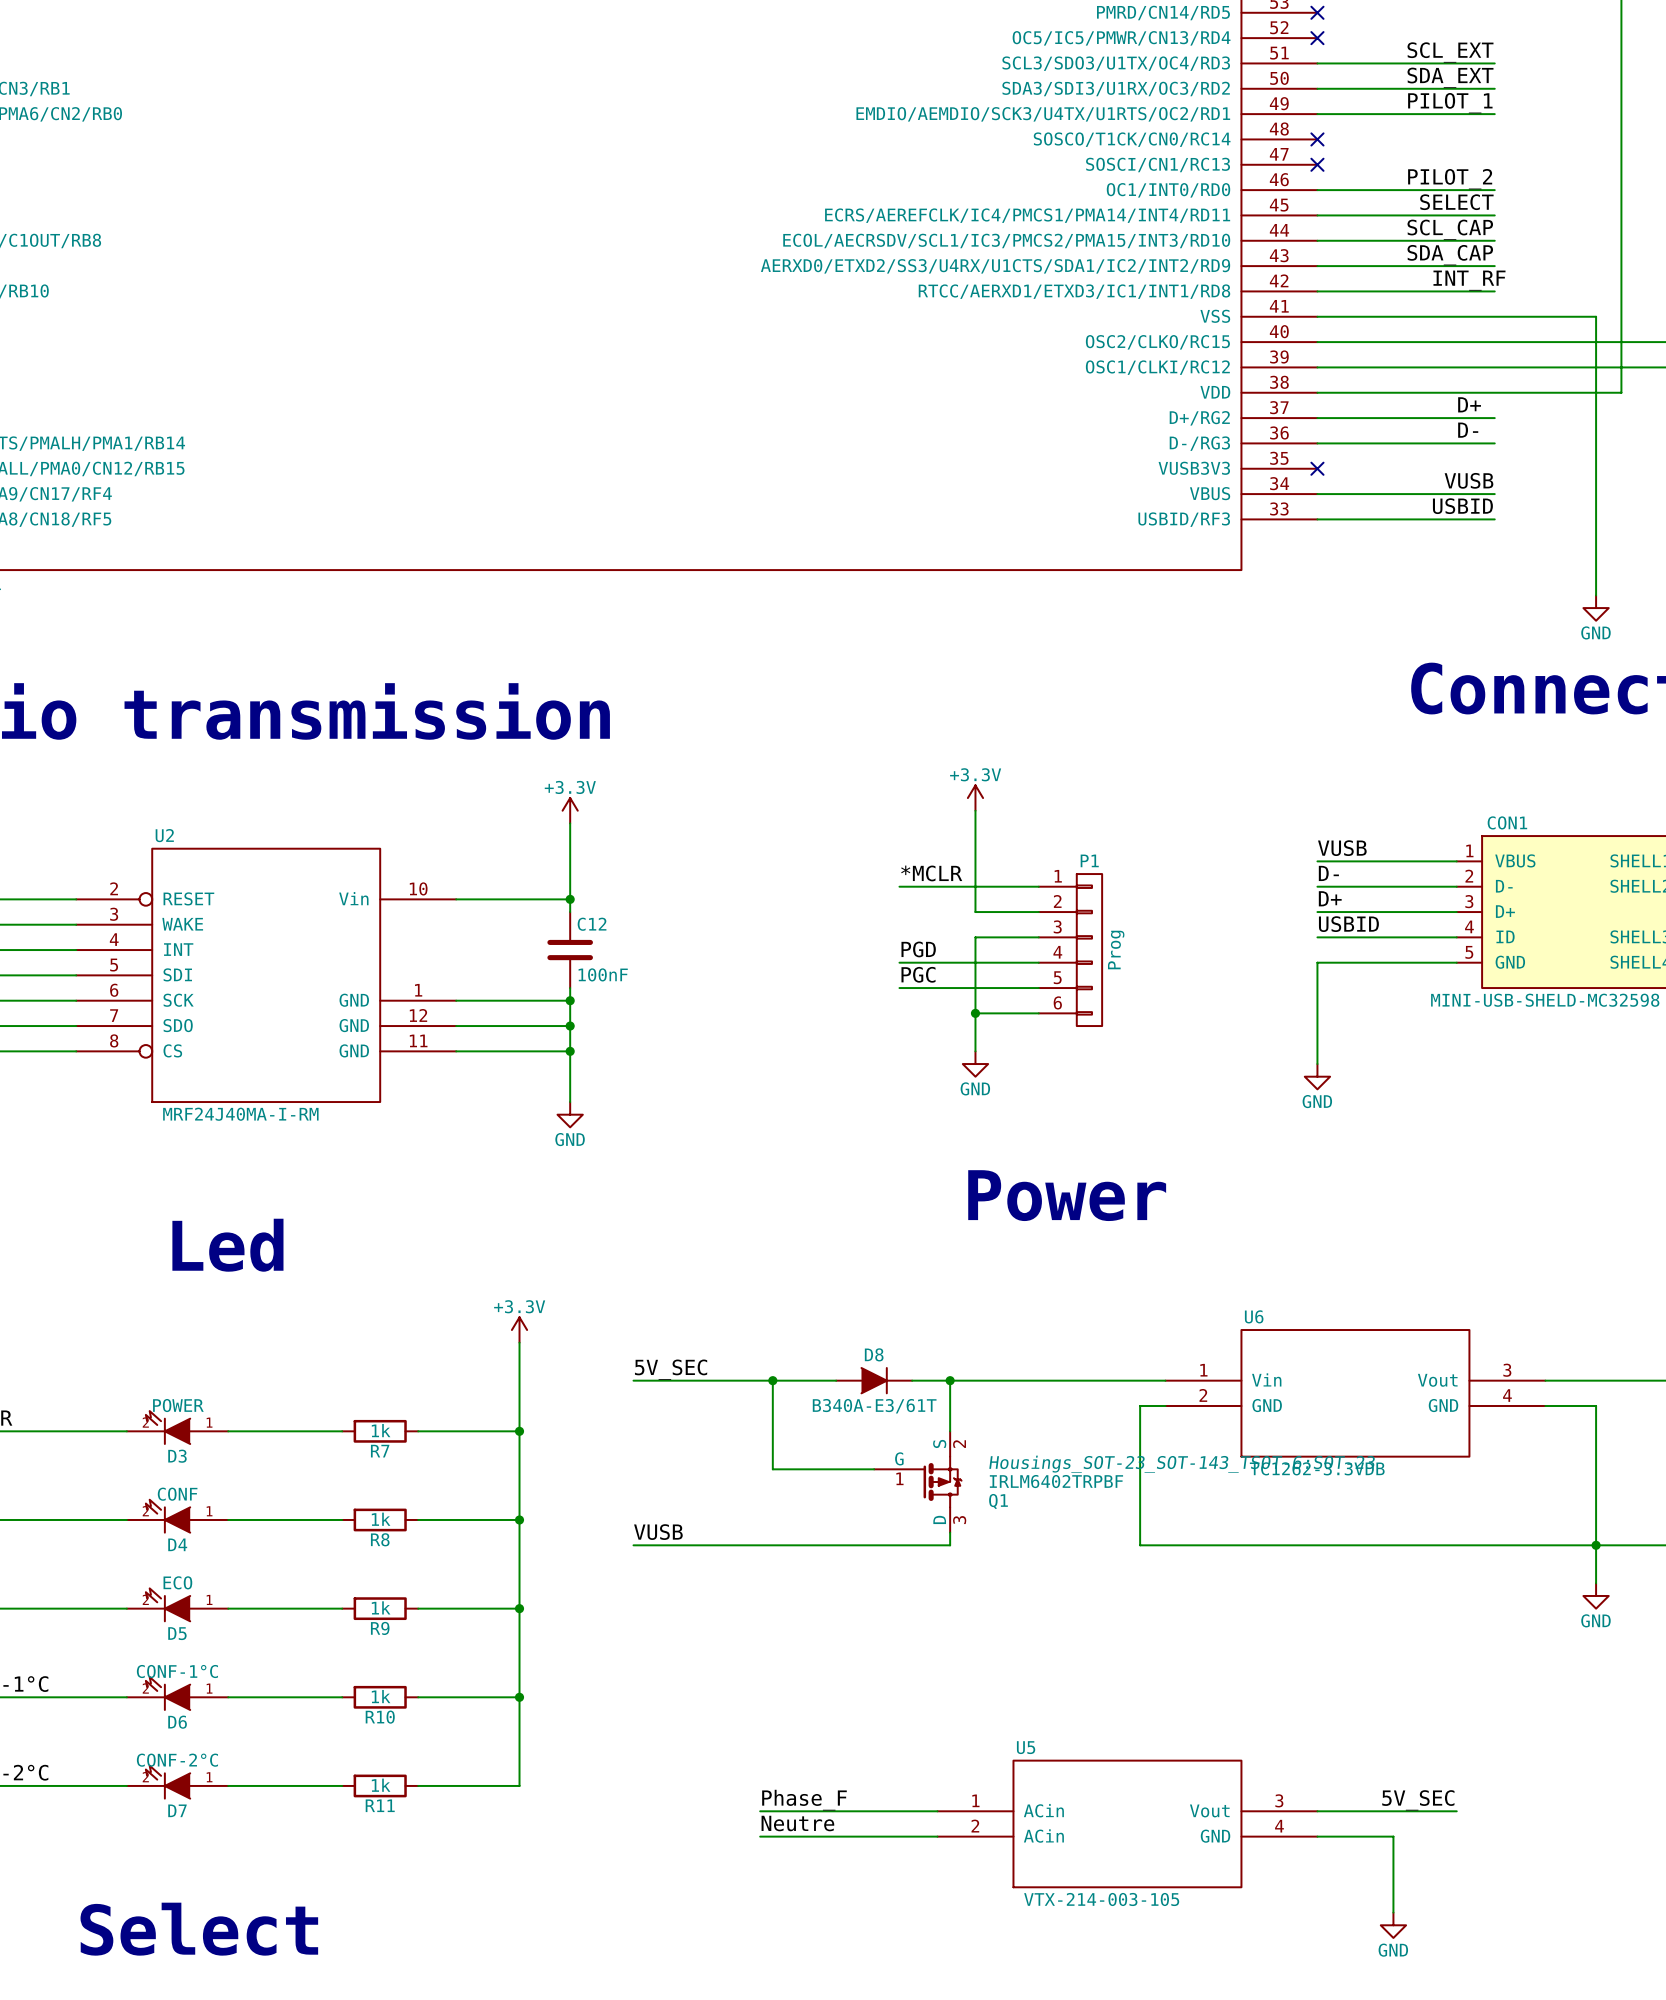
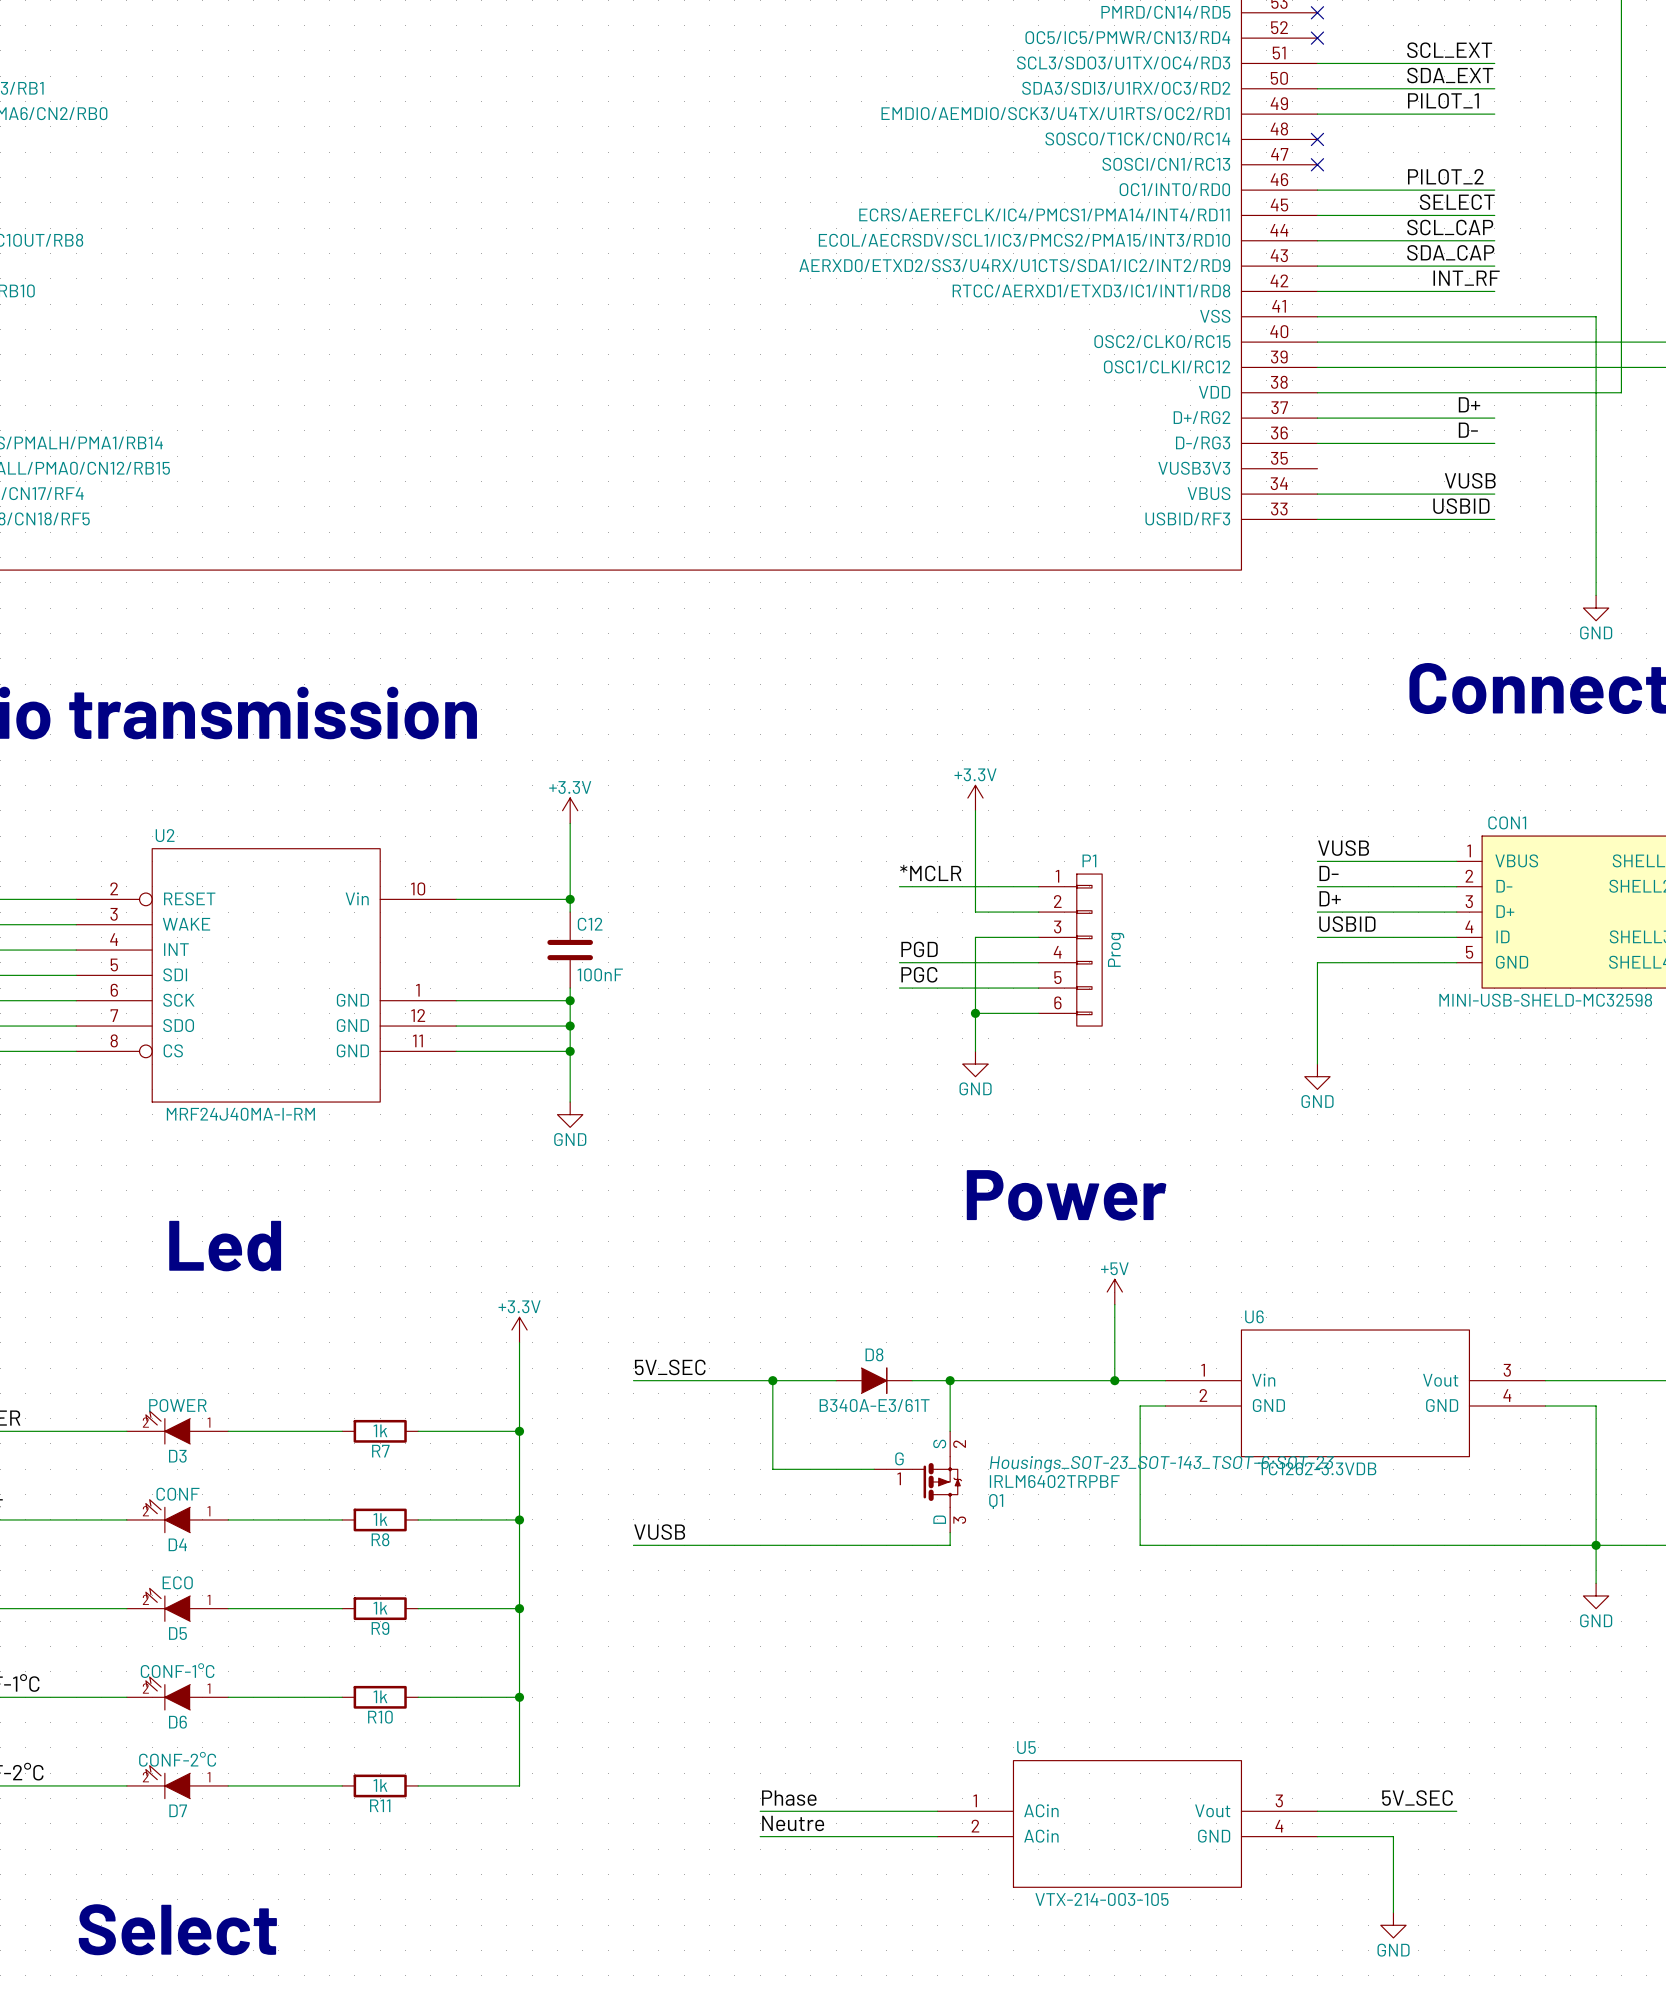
no-connect mark: (1317, 468) -> none
power symbol: none -> +5V (1114, 1292)
wire: none -> (1114, 1304) (1114, 1380)
junction: none -> (1114, 1380)
label: Phase_F (804, 1800) -> Phase (789, 1798)

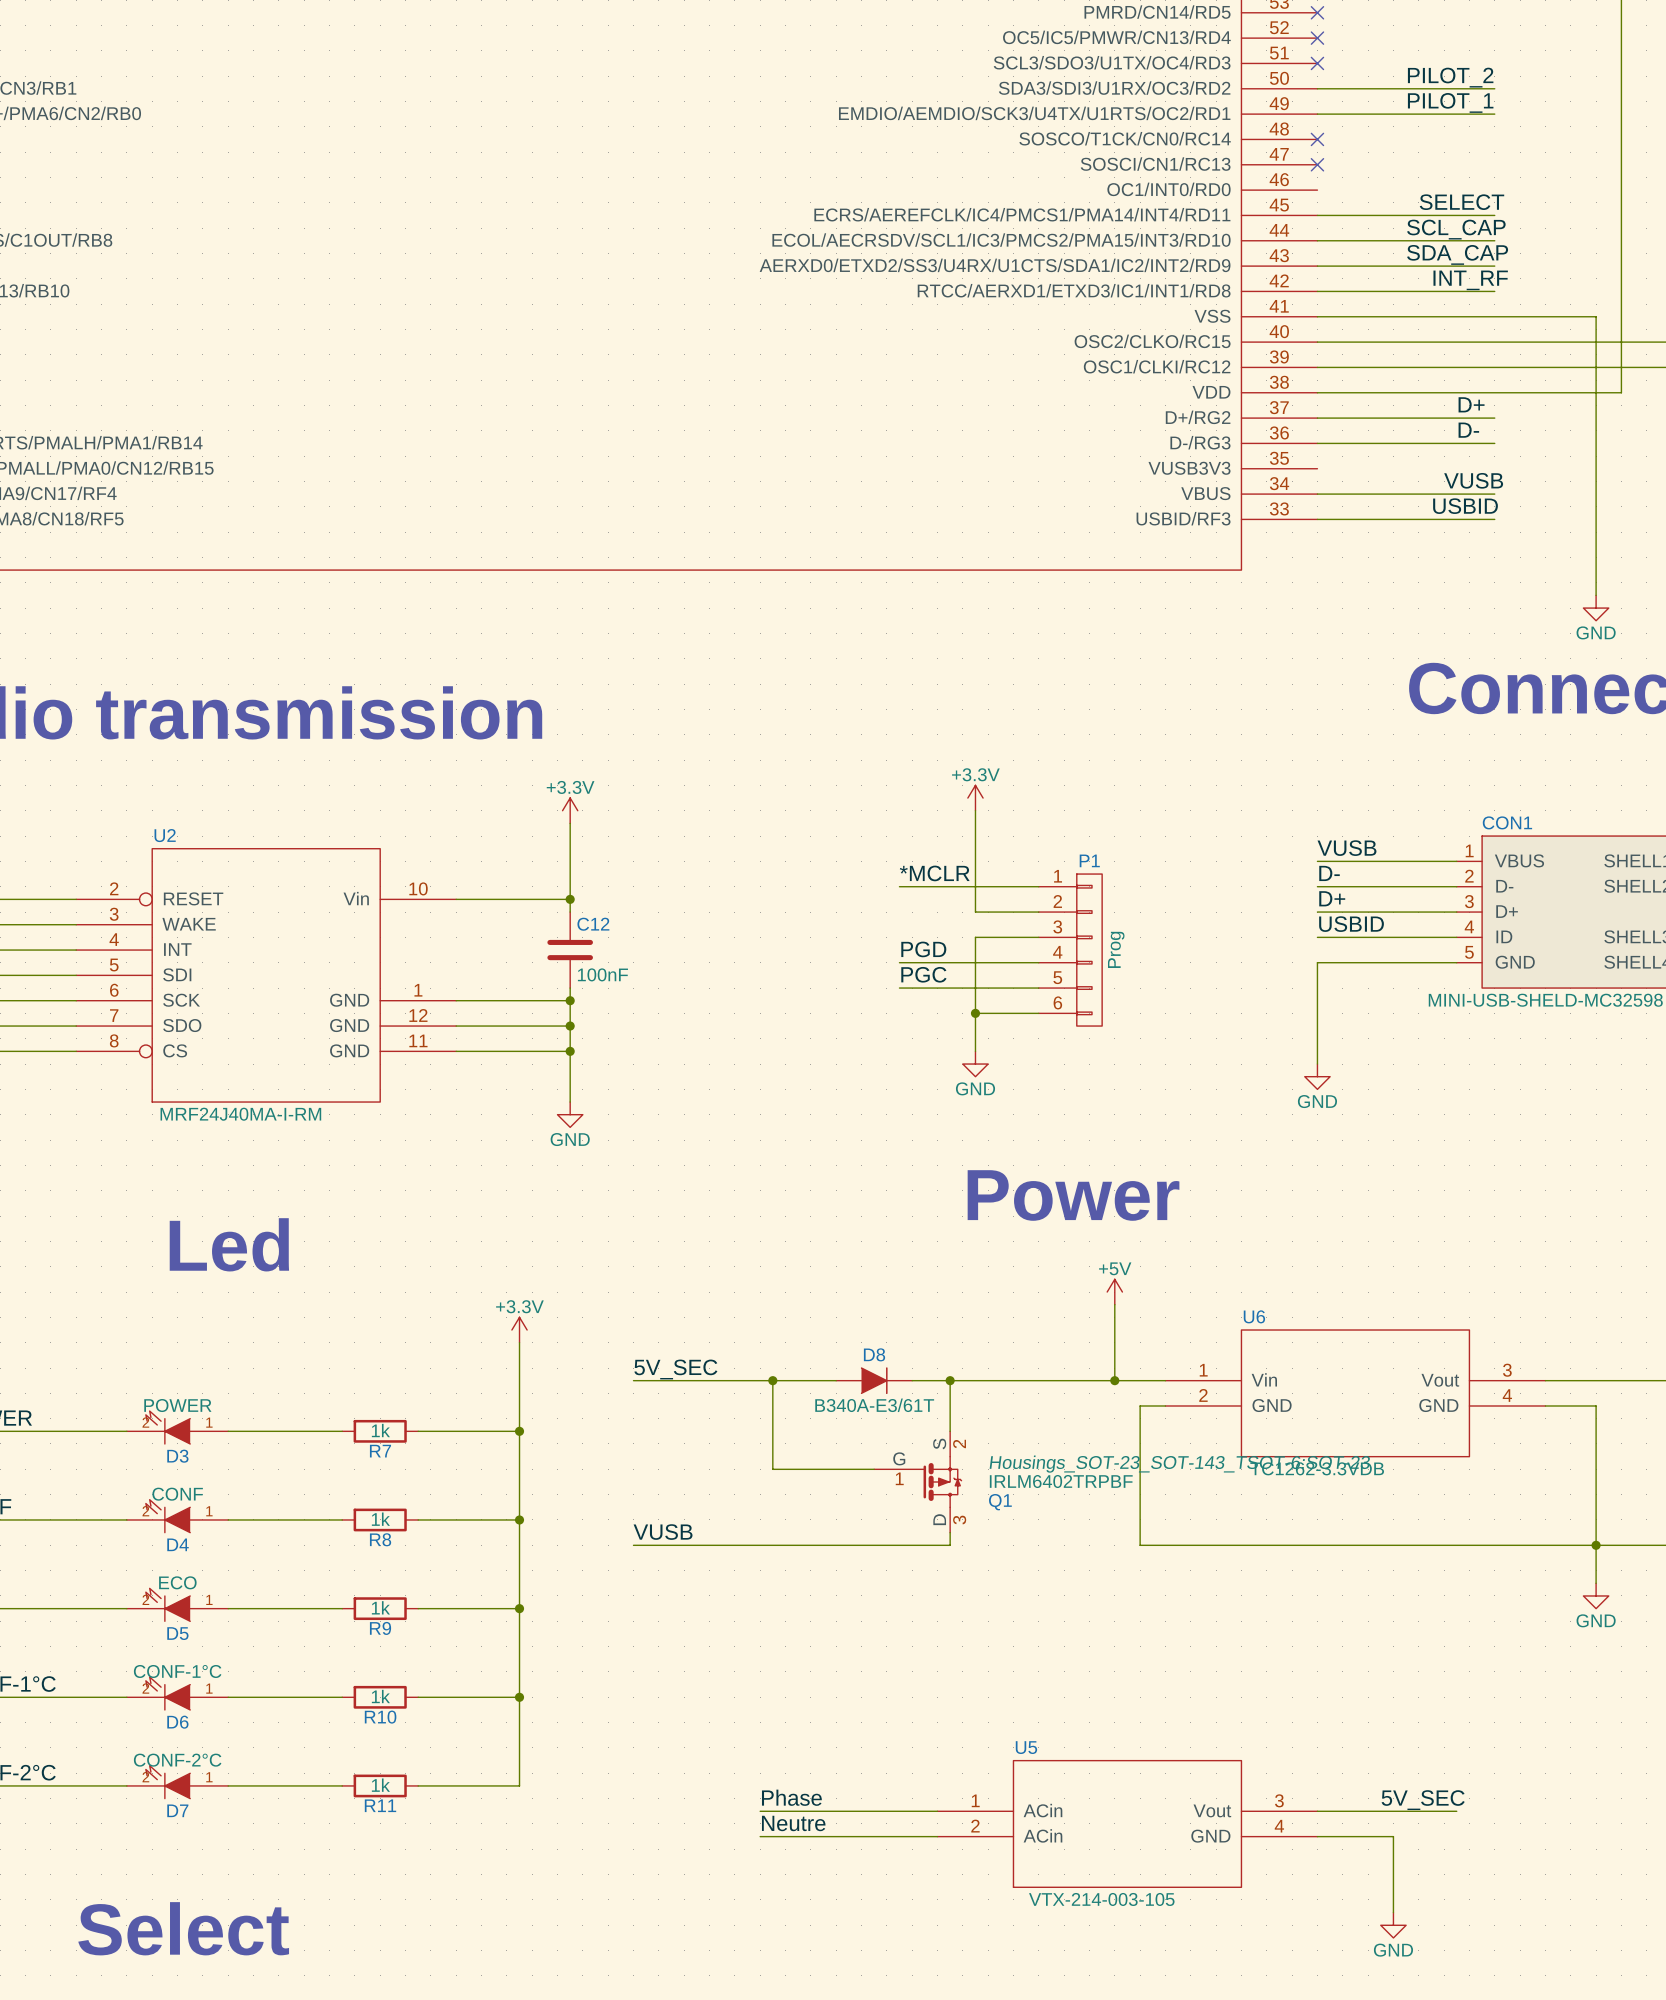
label: SCL_EXT (1449, 50) -> none
wire: (1317, 63) (1494, 63) -> none
no-connect mark: none -> (1317, 63)
label: SDA_EXT (1450, 75) -> PILOT_2 (1450, 77)
label: PILOT_2 (1445, 176) -> none
wire: (1317, 190) (1494, 190) -> none

